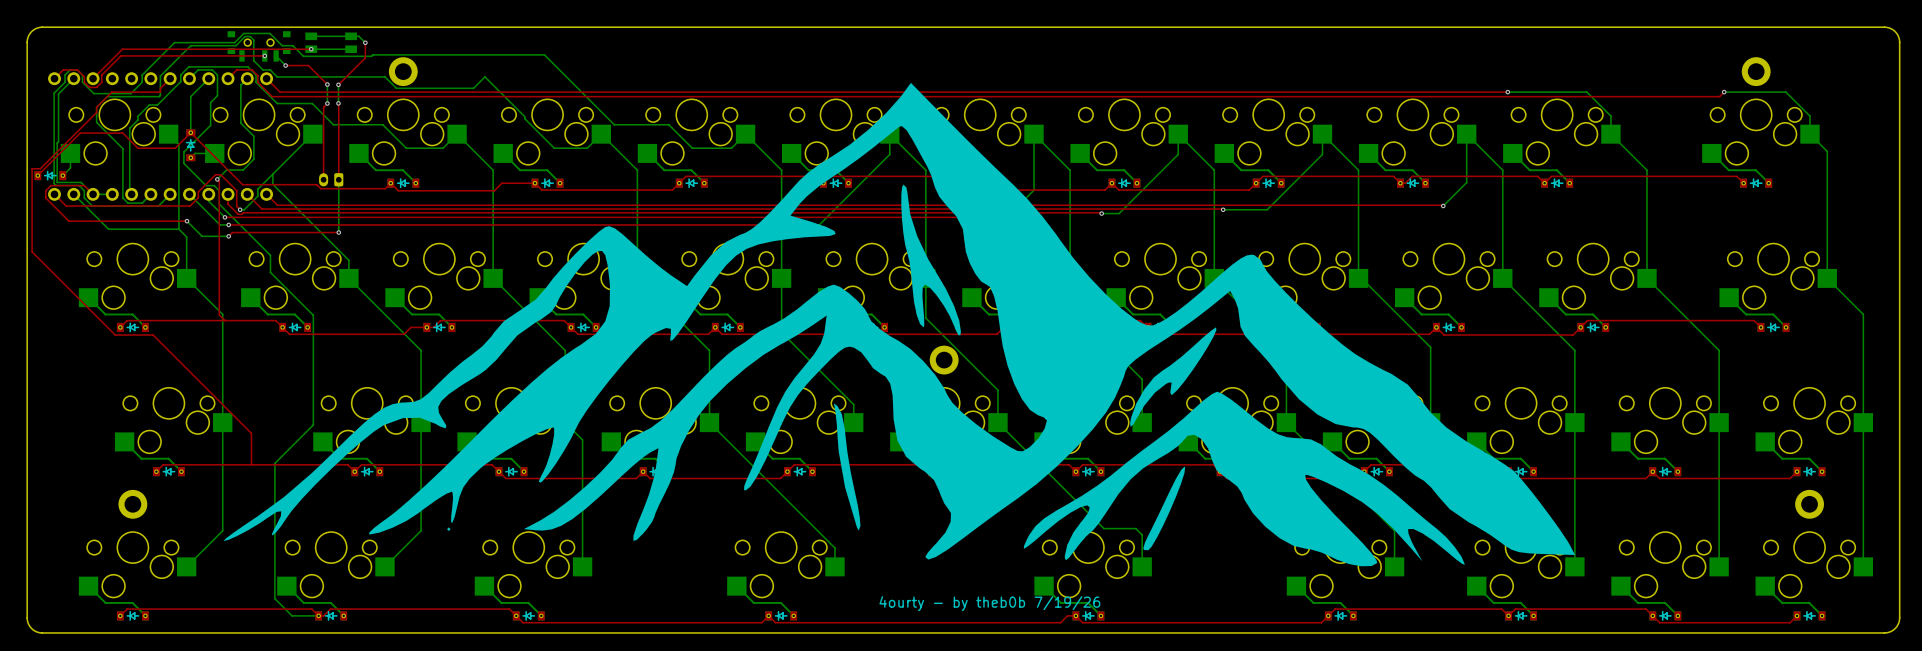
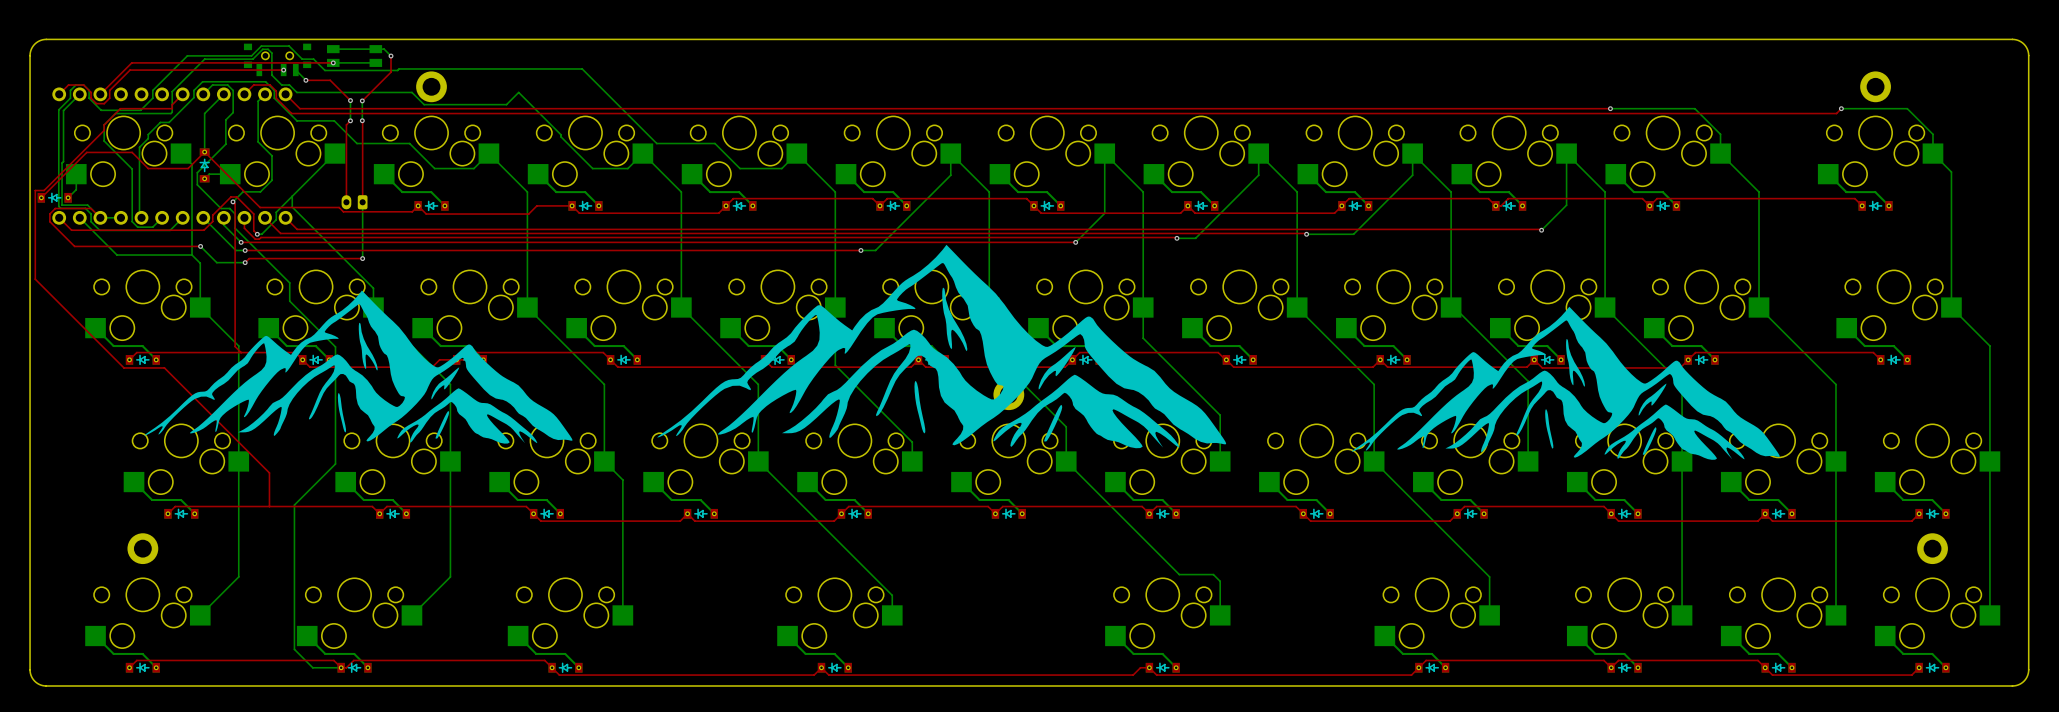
drawing: [223, 82, 1576, 567] -> none
drawing: none -> [657, 244, 1227, 449]
drawing: none -> [144, 290, 573, 444]
drawing: none -> [1351, 306, 1780, 460]
text: 4ourty - by theb0b 7/19/26 (989, 603) -> none

